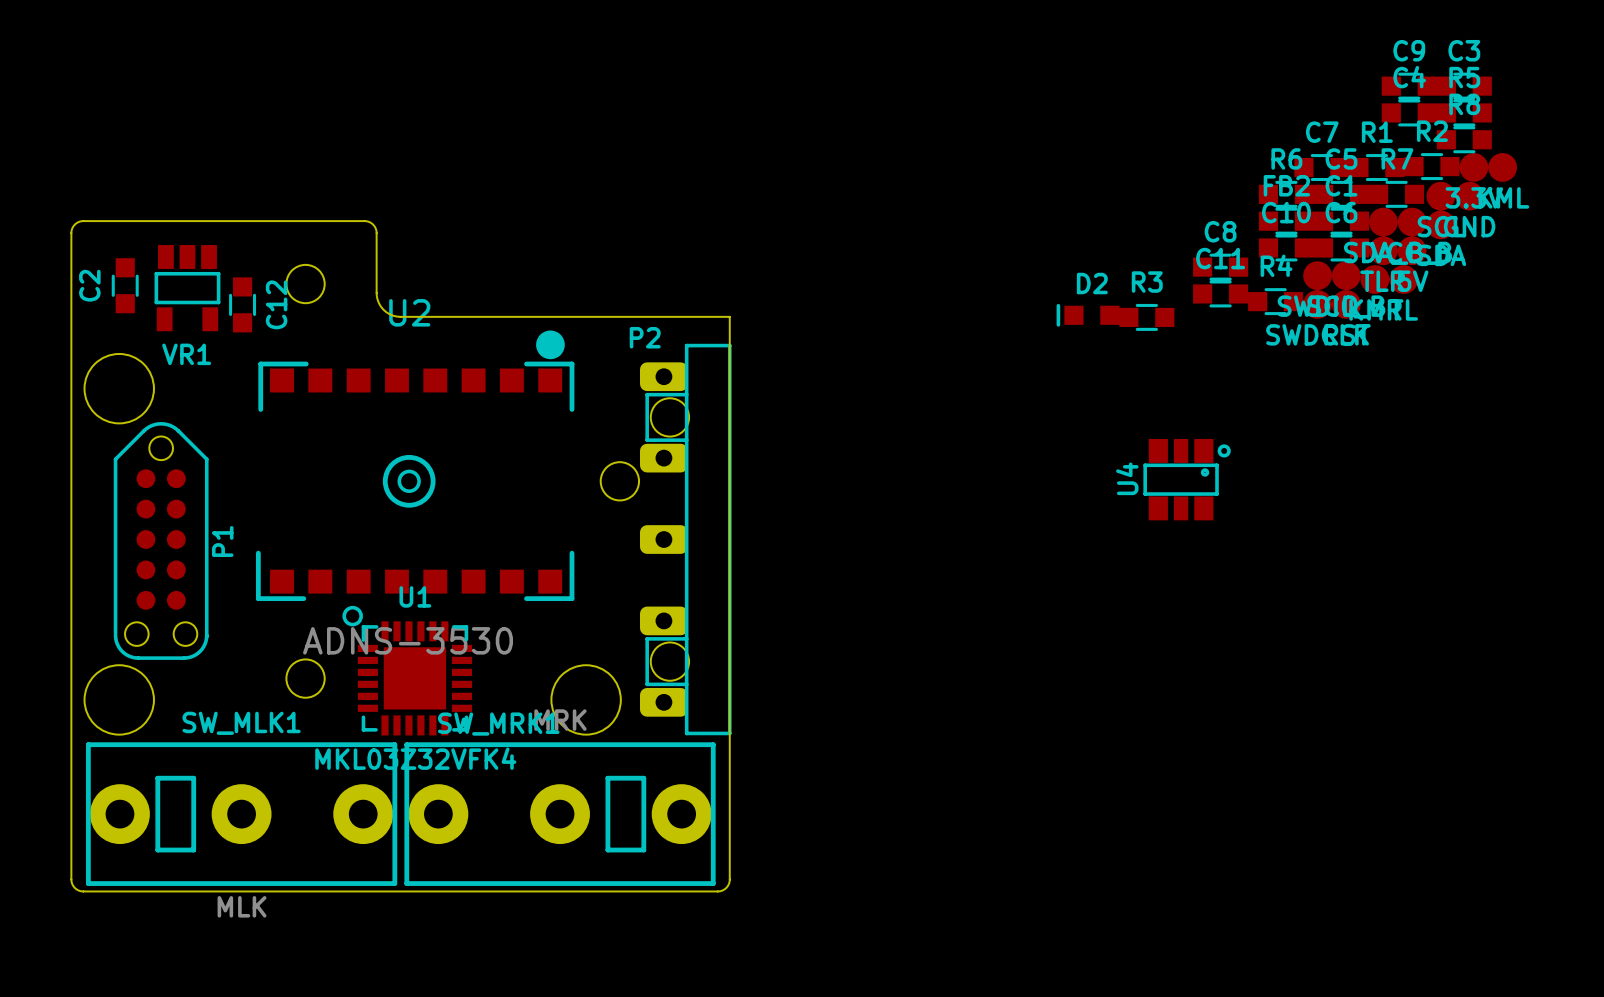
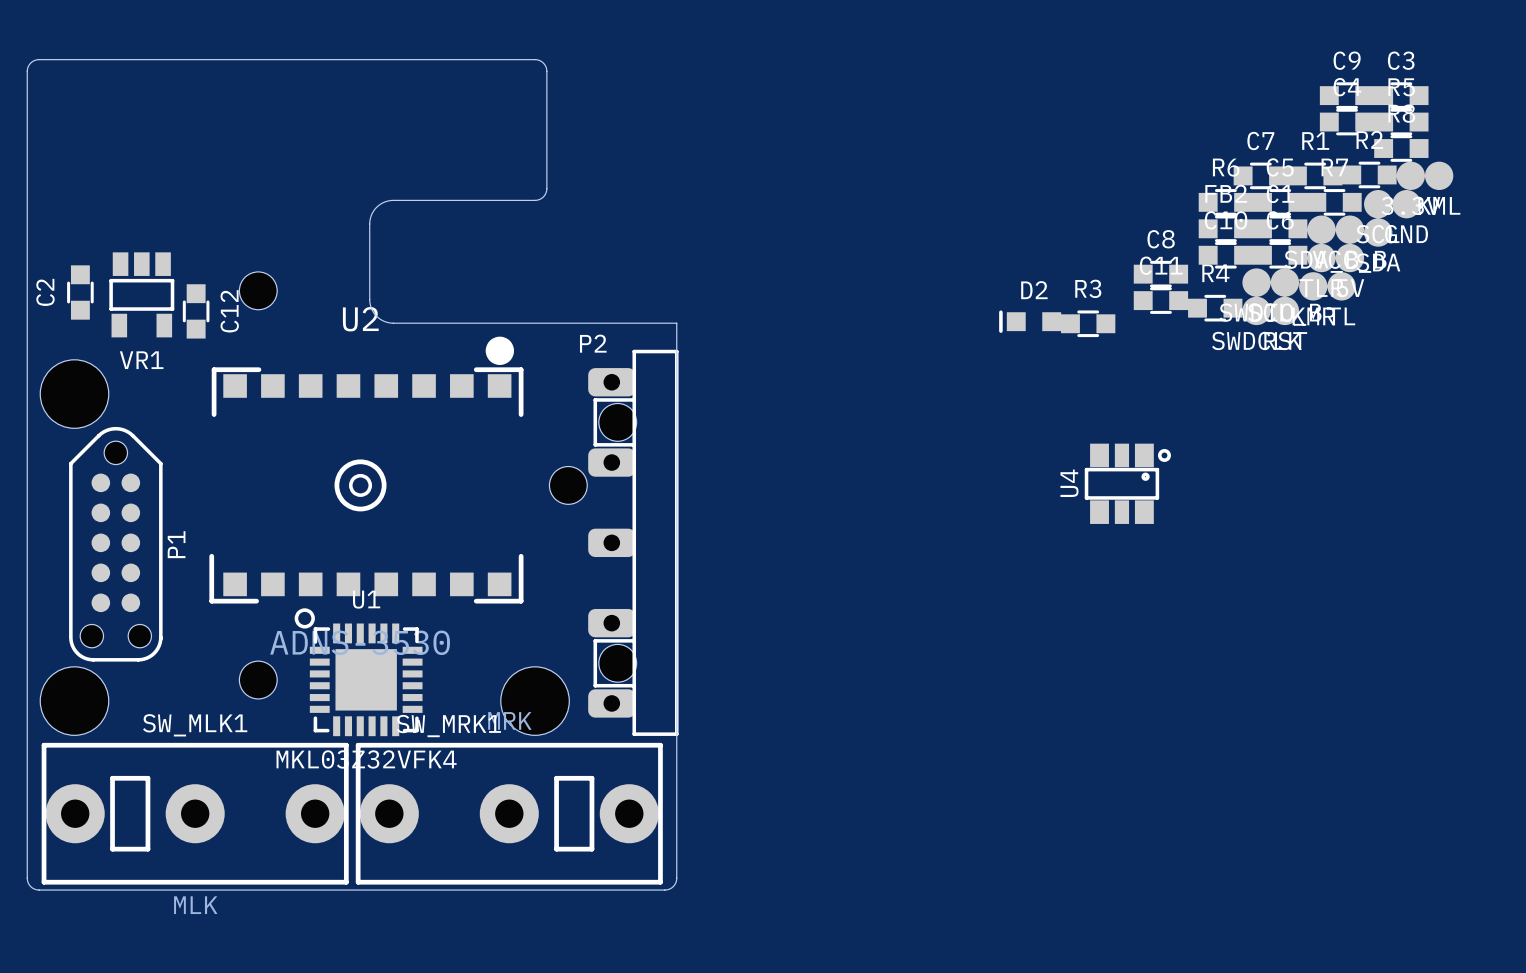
board edge: (71, 233) (74, 224) (83, 221) (367, 221) (373, 224) (376, 231) (376, 296) (381, 307) (388, 313) (397, 316) (442, 316) -> (27, 240) (27, 71) (29, 64) (35, 60) (535, 59) (541, 61) (546, 71) (546, 188) (542, 197) (535, 200) (390, 200) (380, 204) (373, 211) (369, 224) (370, 304) (378, 318) (393, 323)

